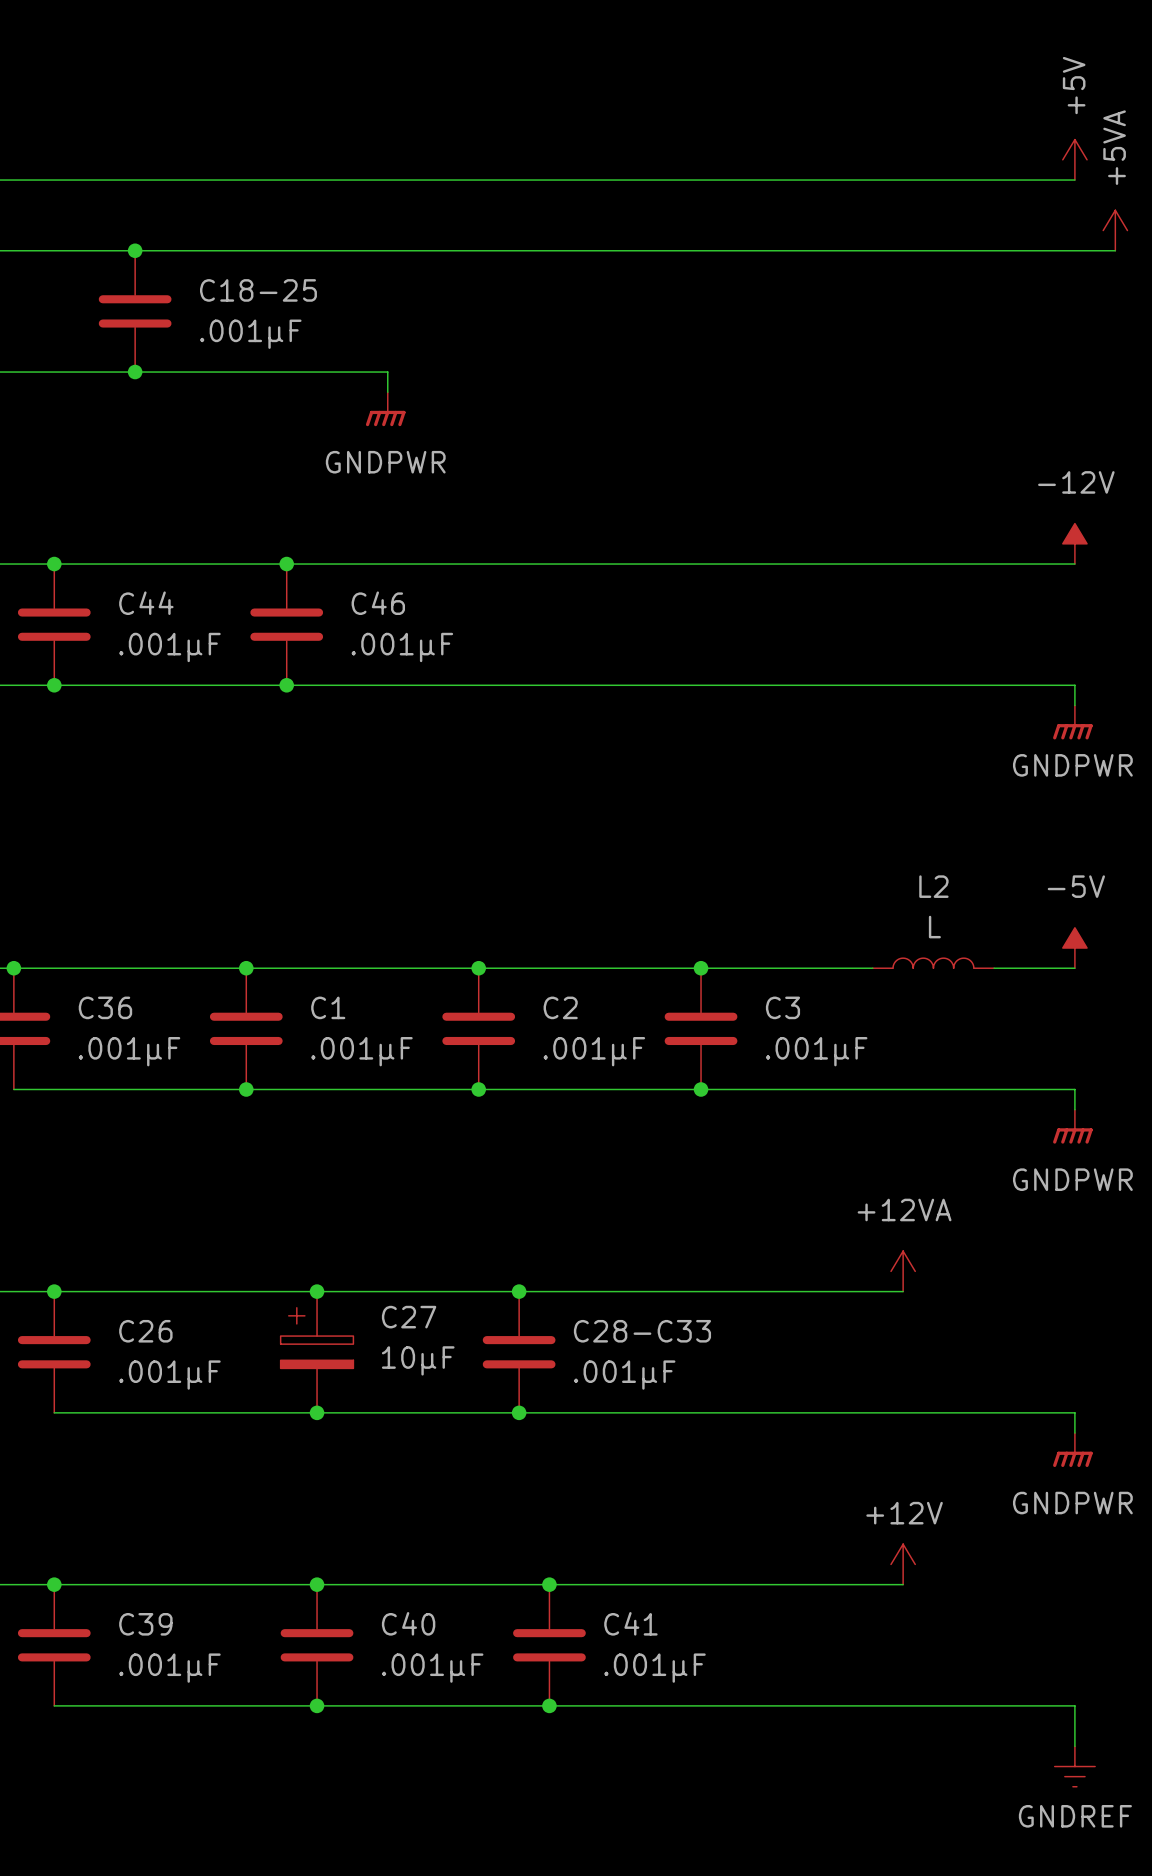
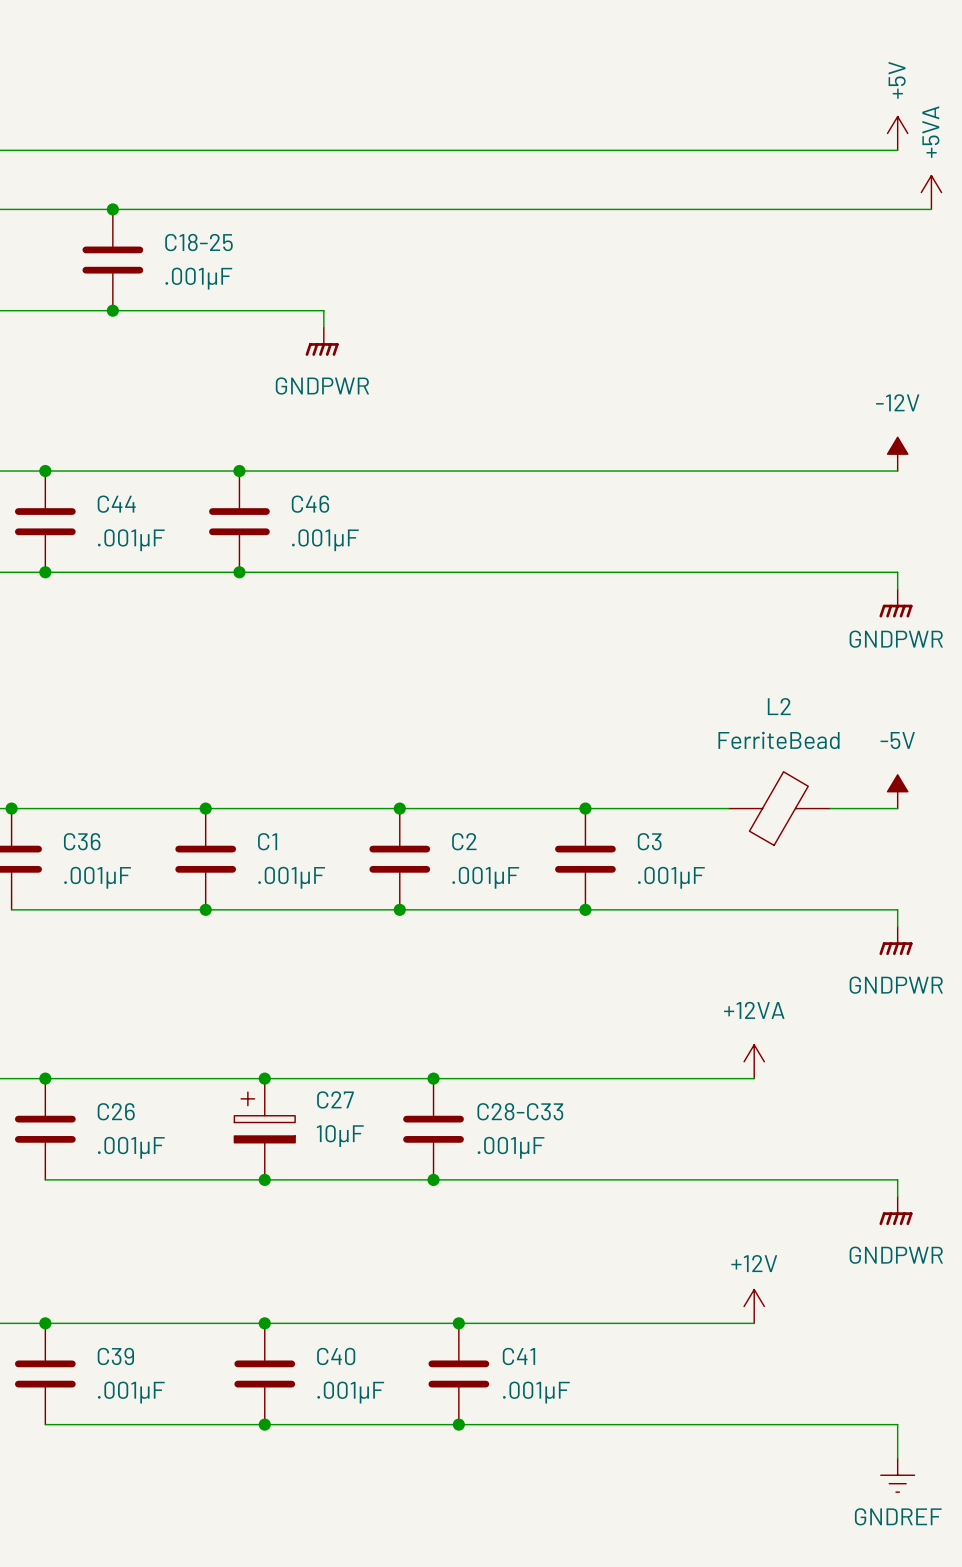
L2 name position: L2 (933, 886) -> L2 (779, 706)
L2 value: L (934, 927) -> FerriteBead (779, 740)
L2 symbol: [872, 958, 995, 969] -> [728, 771, 831, 846]

